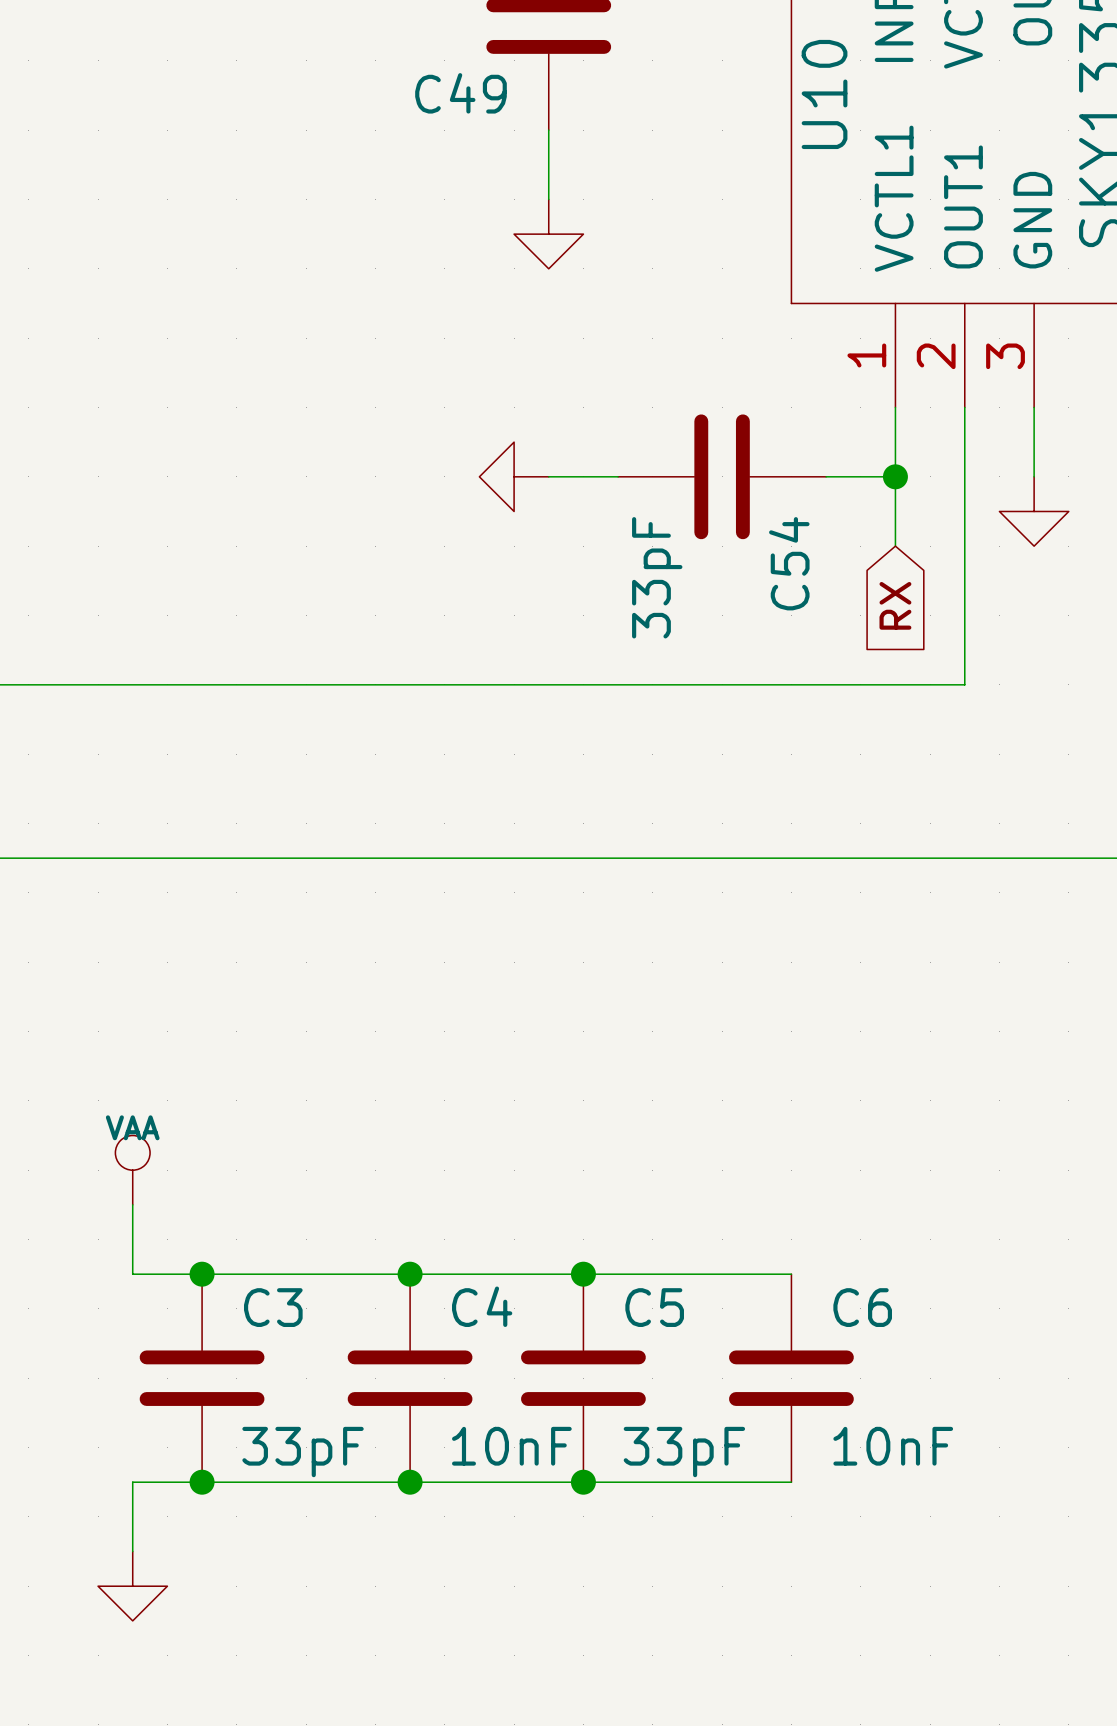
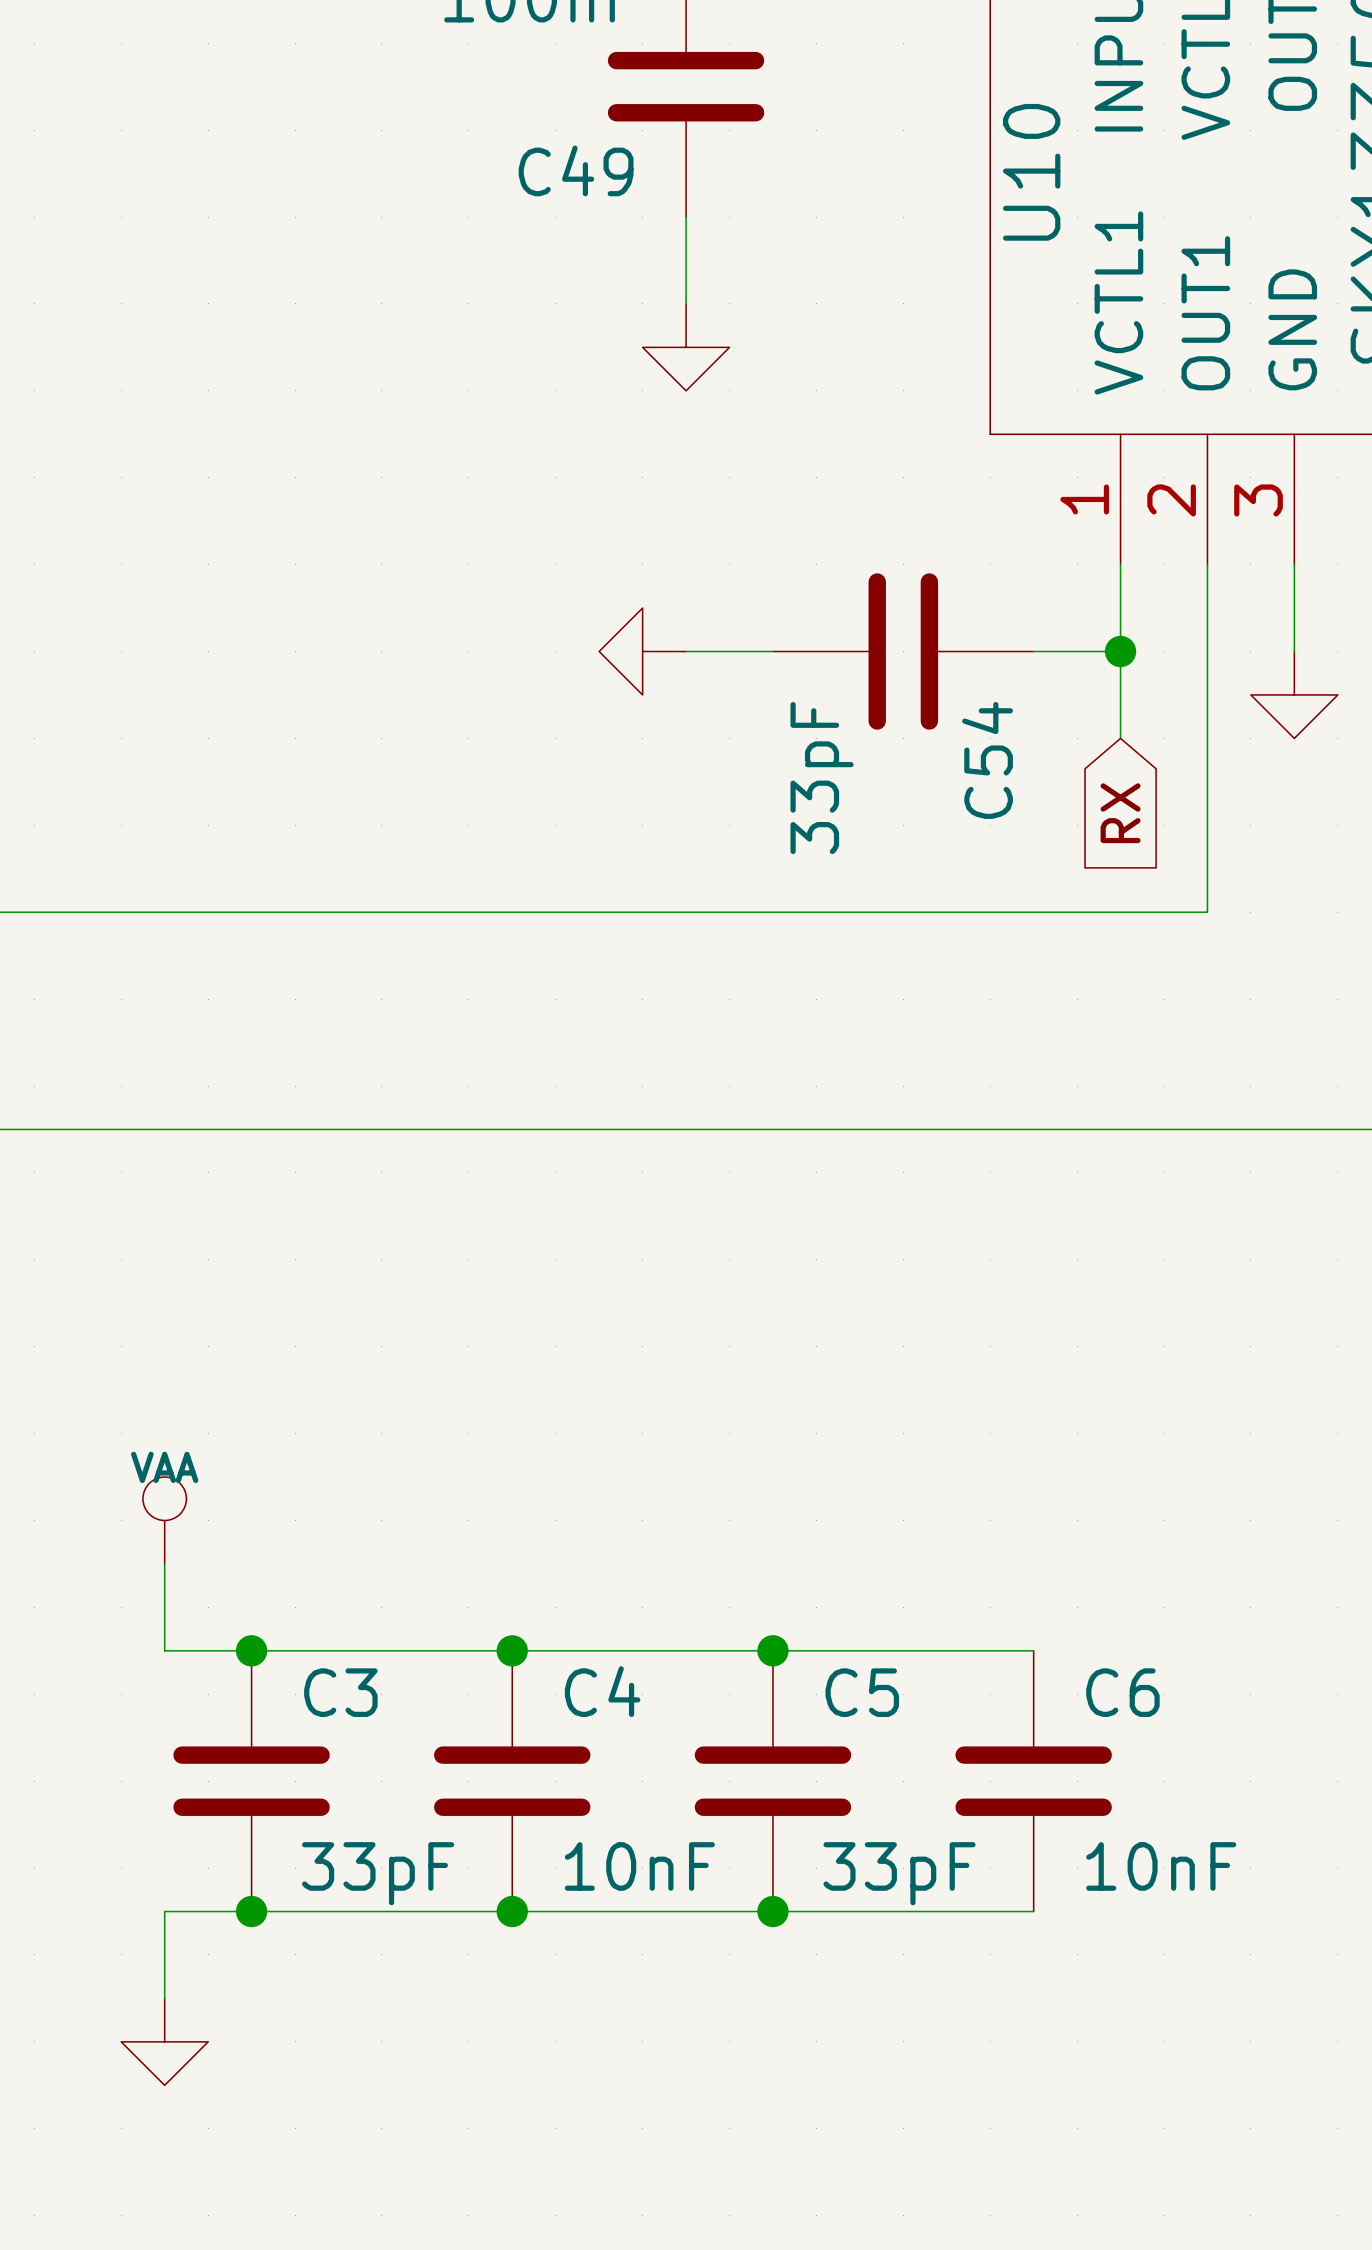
junction position: (583, 1274) -> (772, 1650)
wire: none -> (990, 1650) (1033, 1650)
C5 position: (583, 1378) -> (772, 1781)
C6 position: (791, 1378) -> (1033, 1781)
junction position: (583, 1482) -> (772, 1911)
wire: none -> (990, 1911) (1033, 1911)

